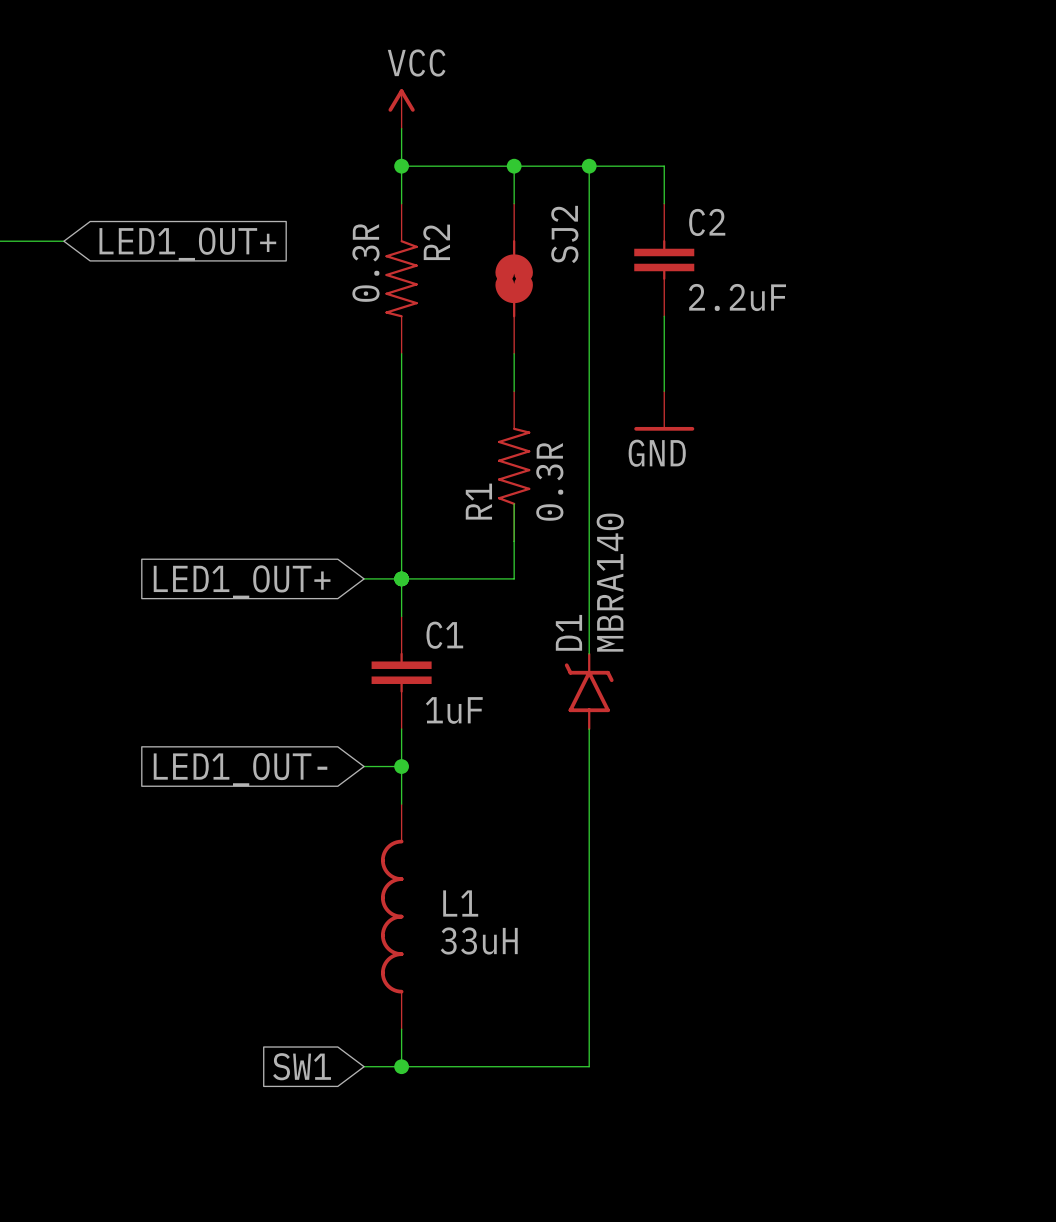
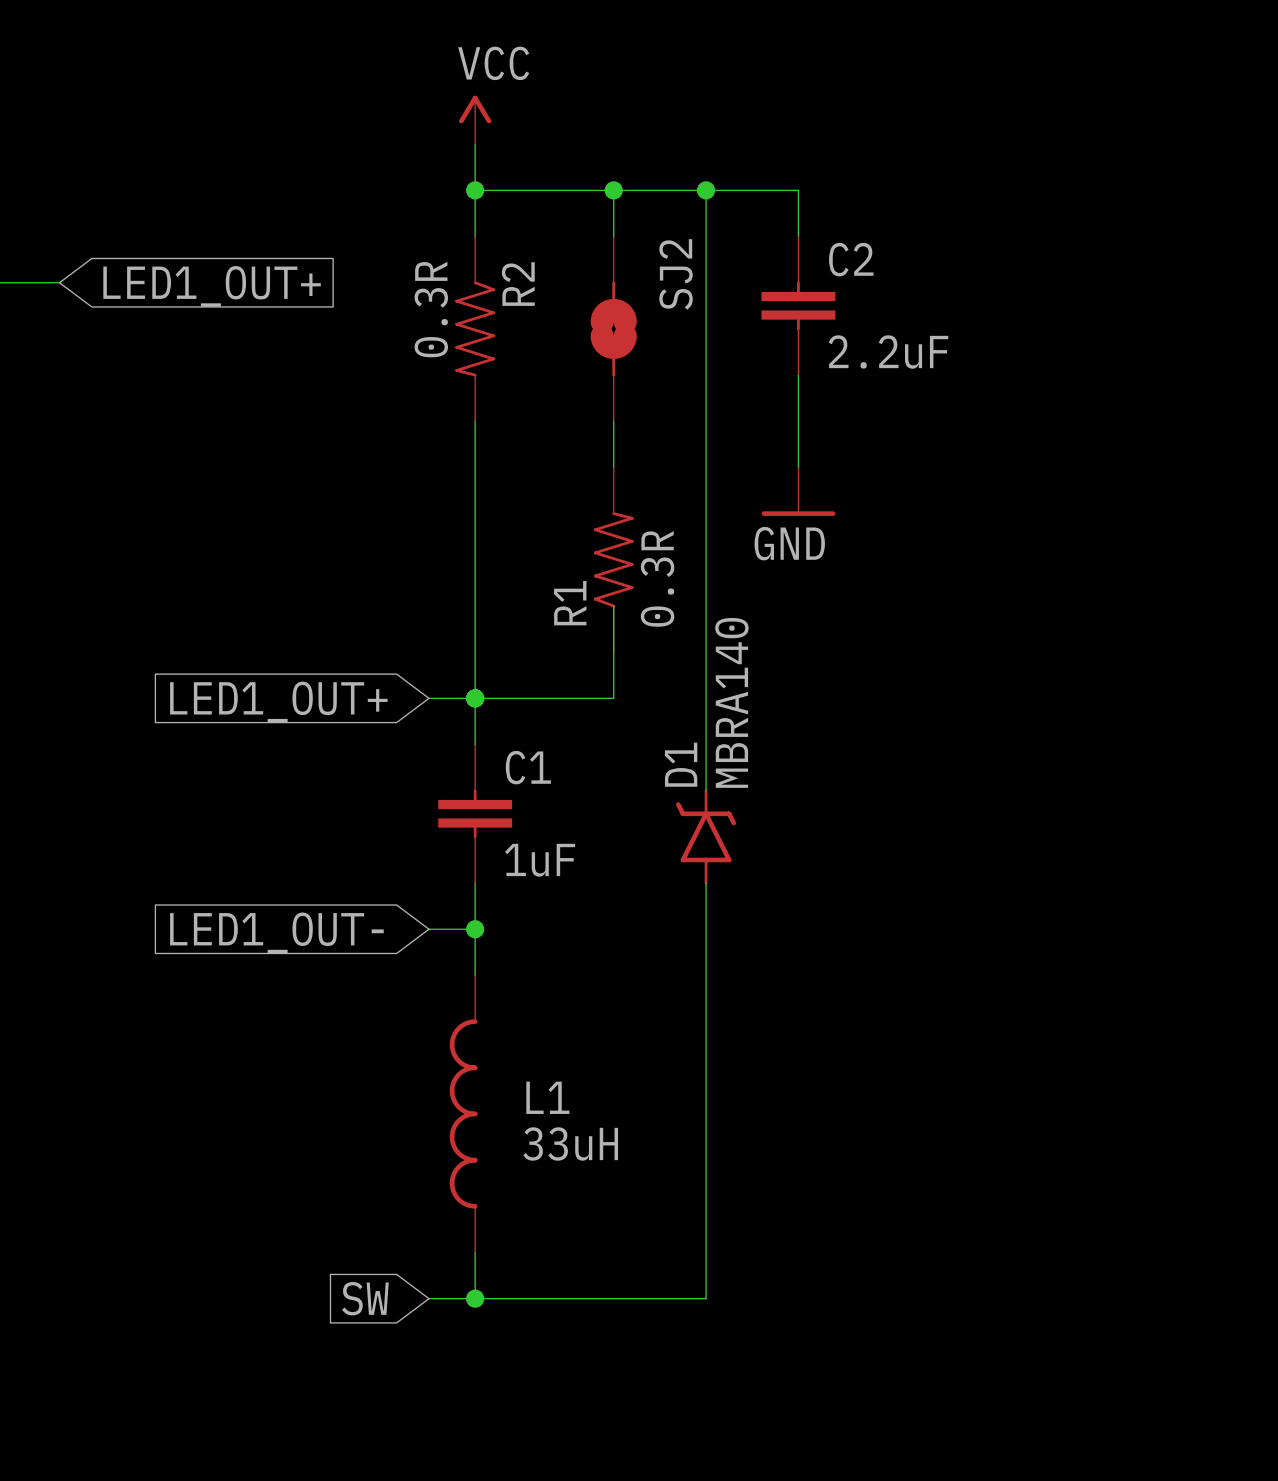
global label: SW1 (302, 1066) -> SW (365, 1298)

